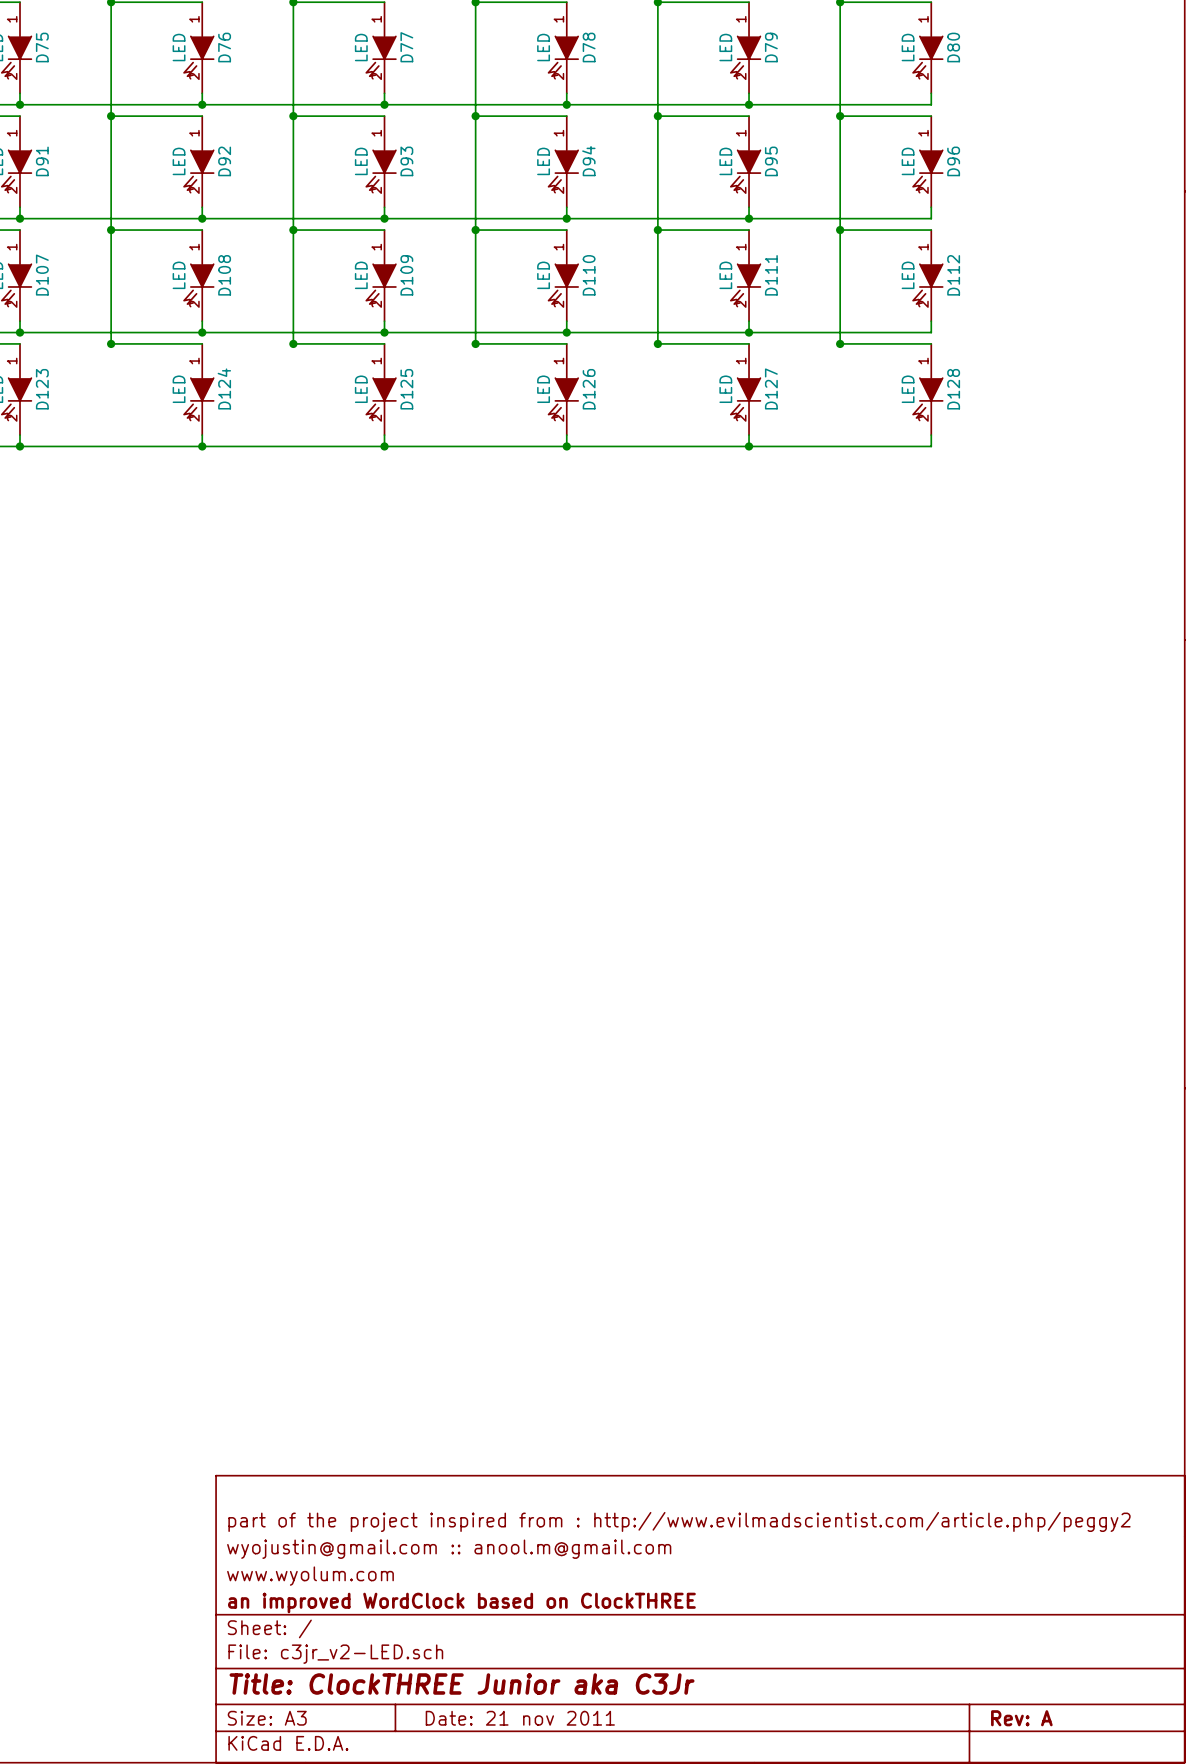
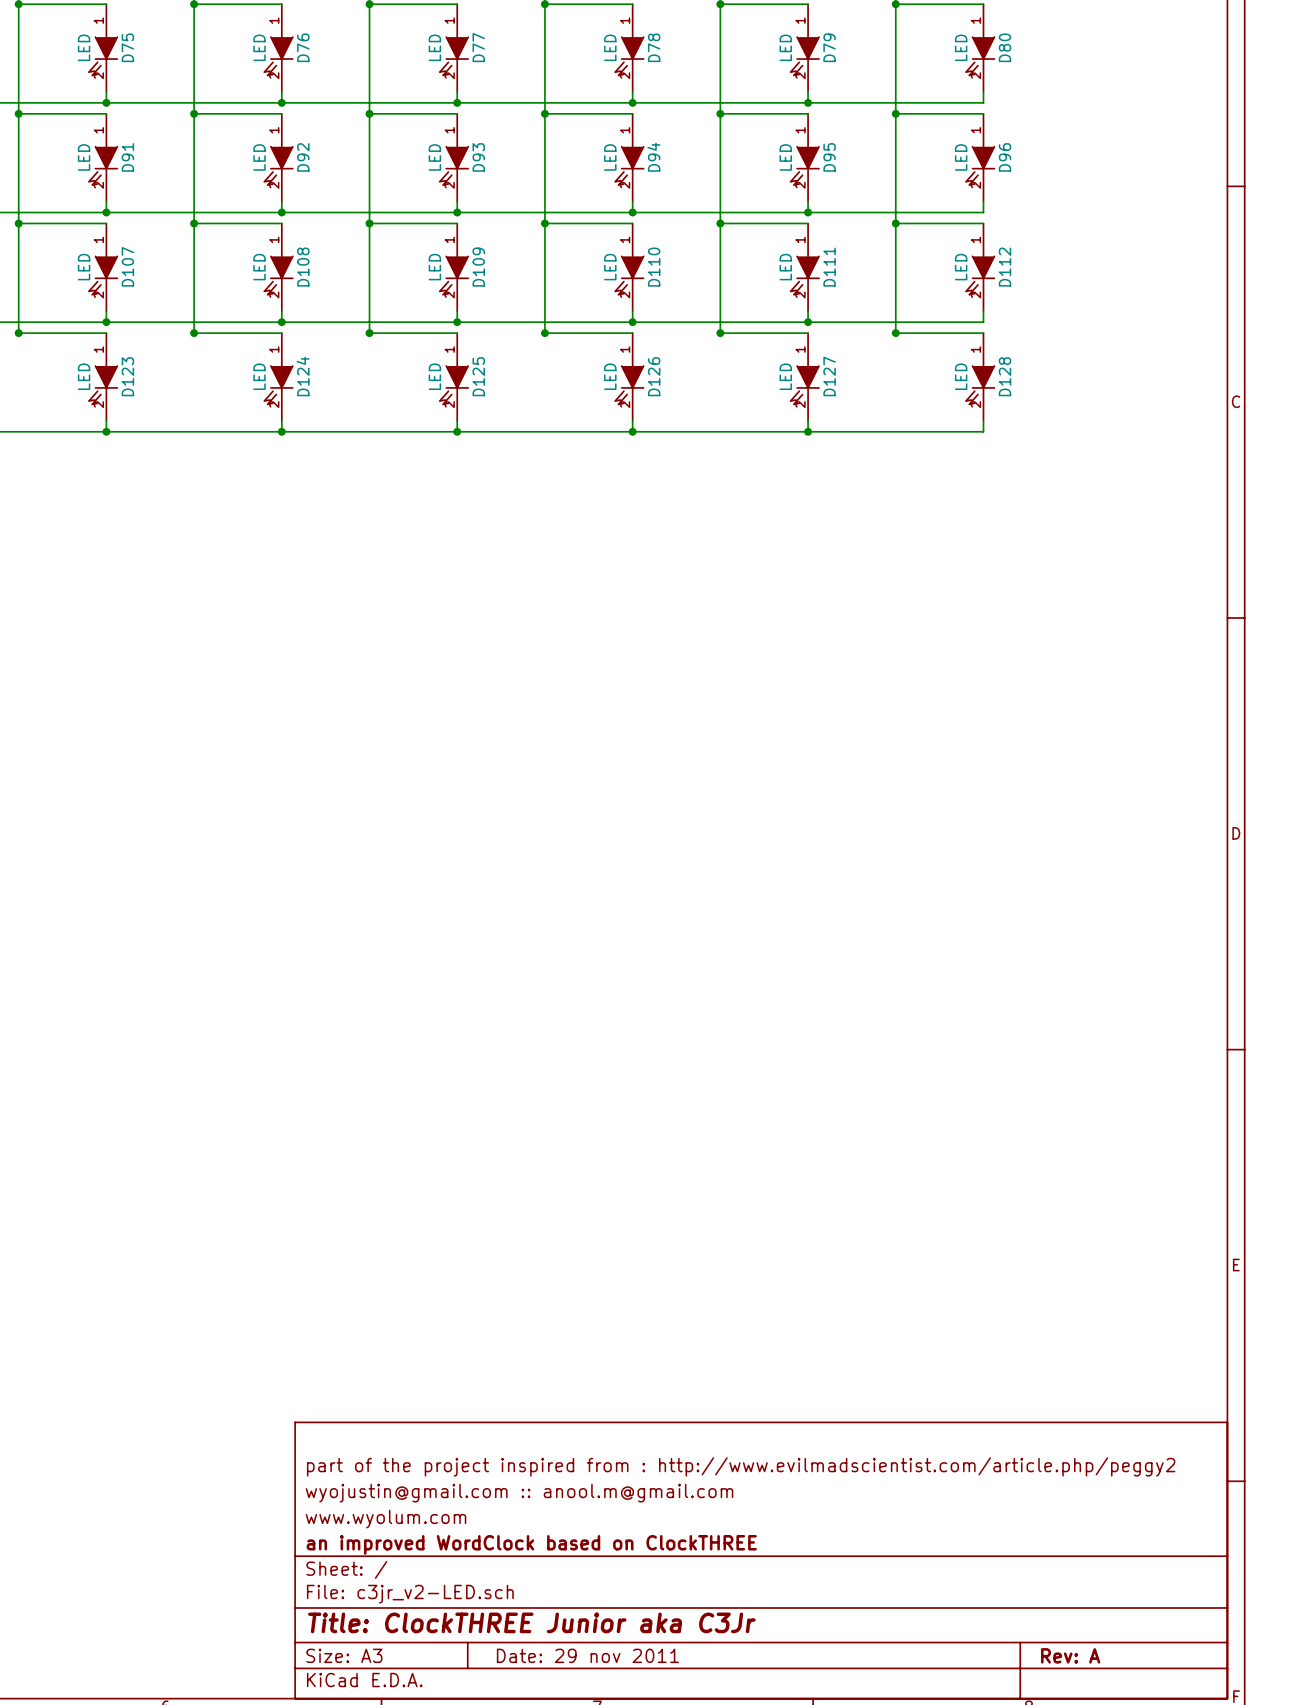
title block: Date: 21 nov 2011 (520, 1718) -> Date: 29 nov 2011 (587, 1655)

